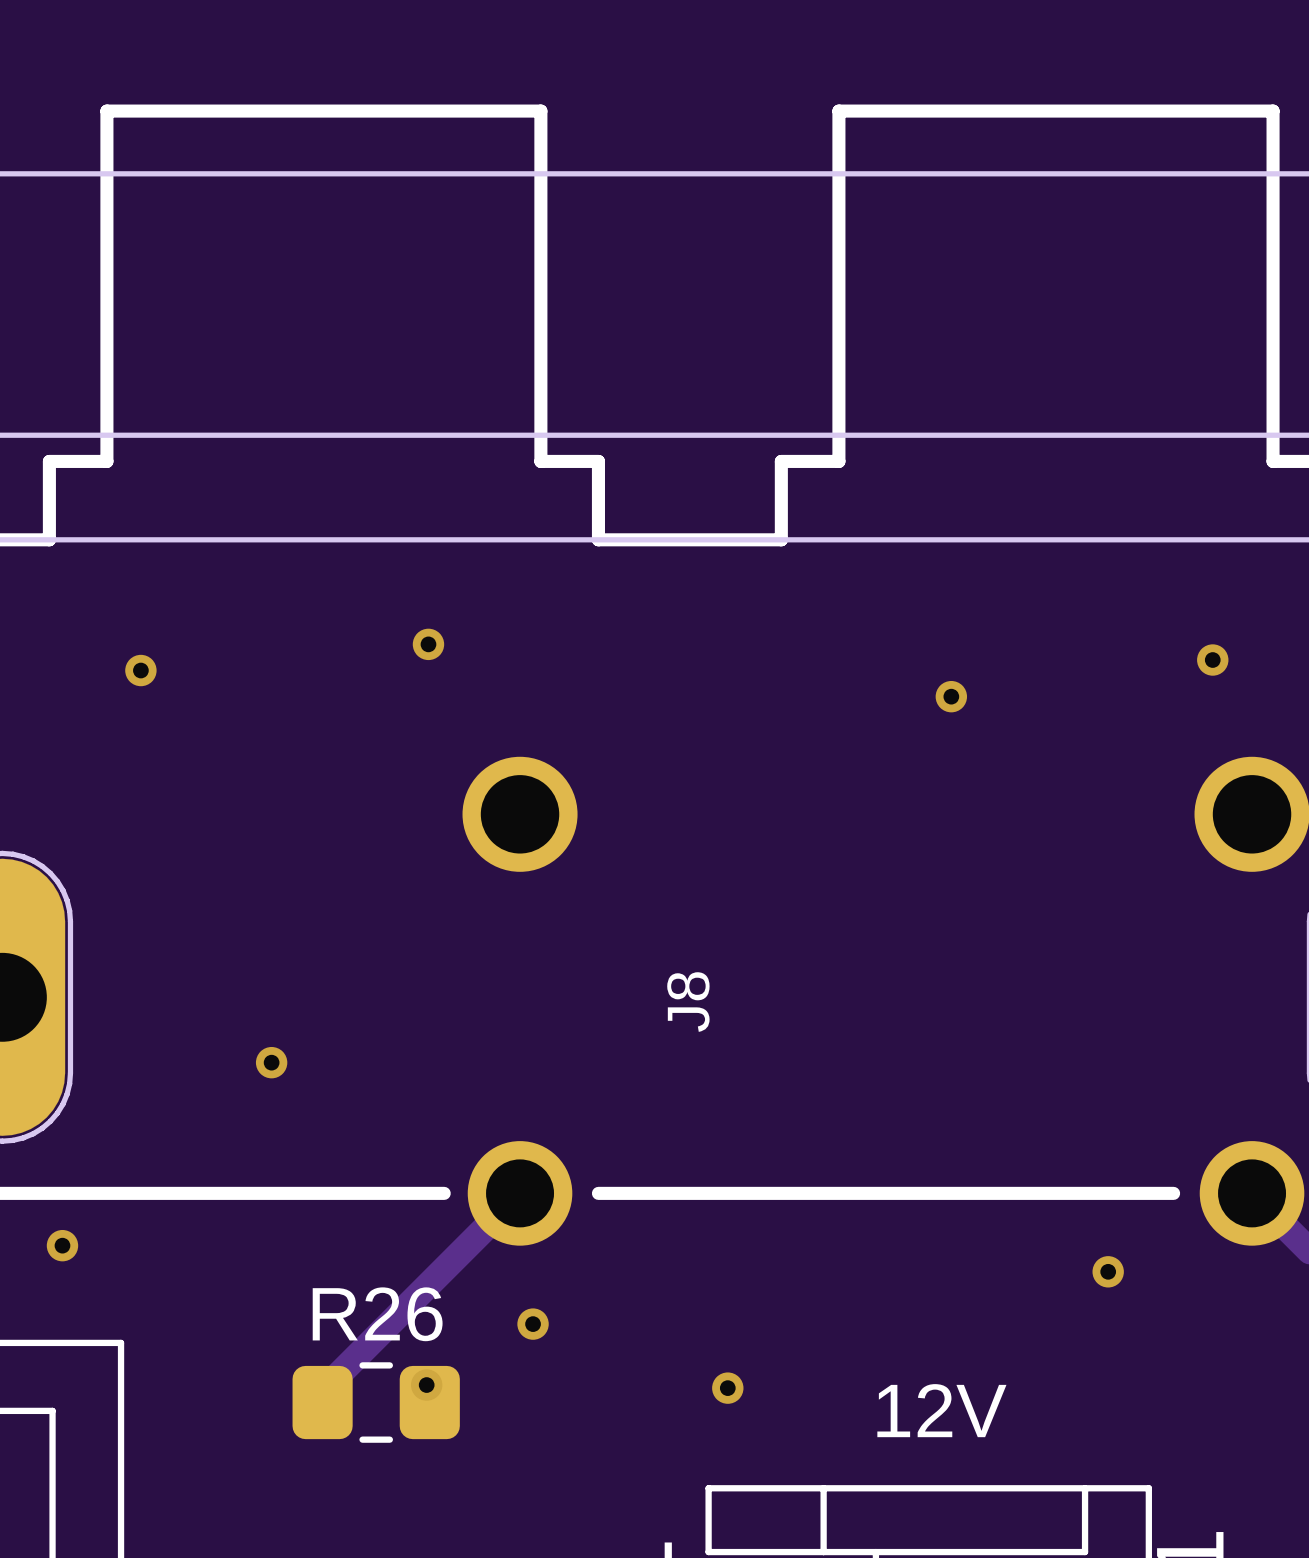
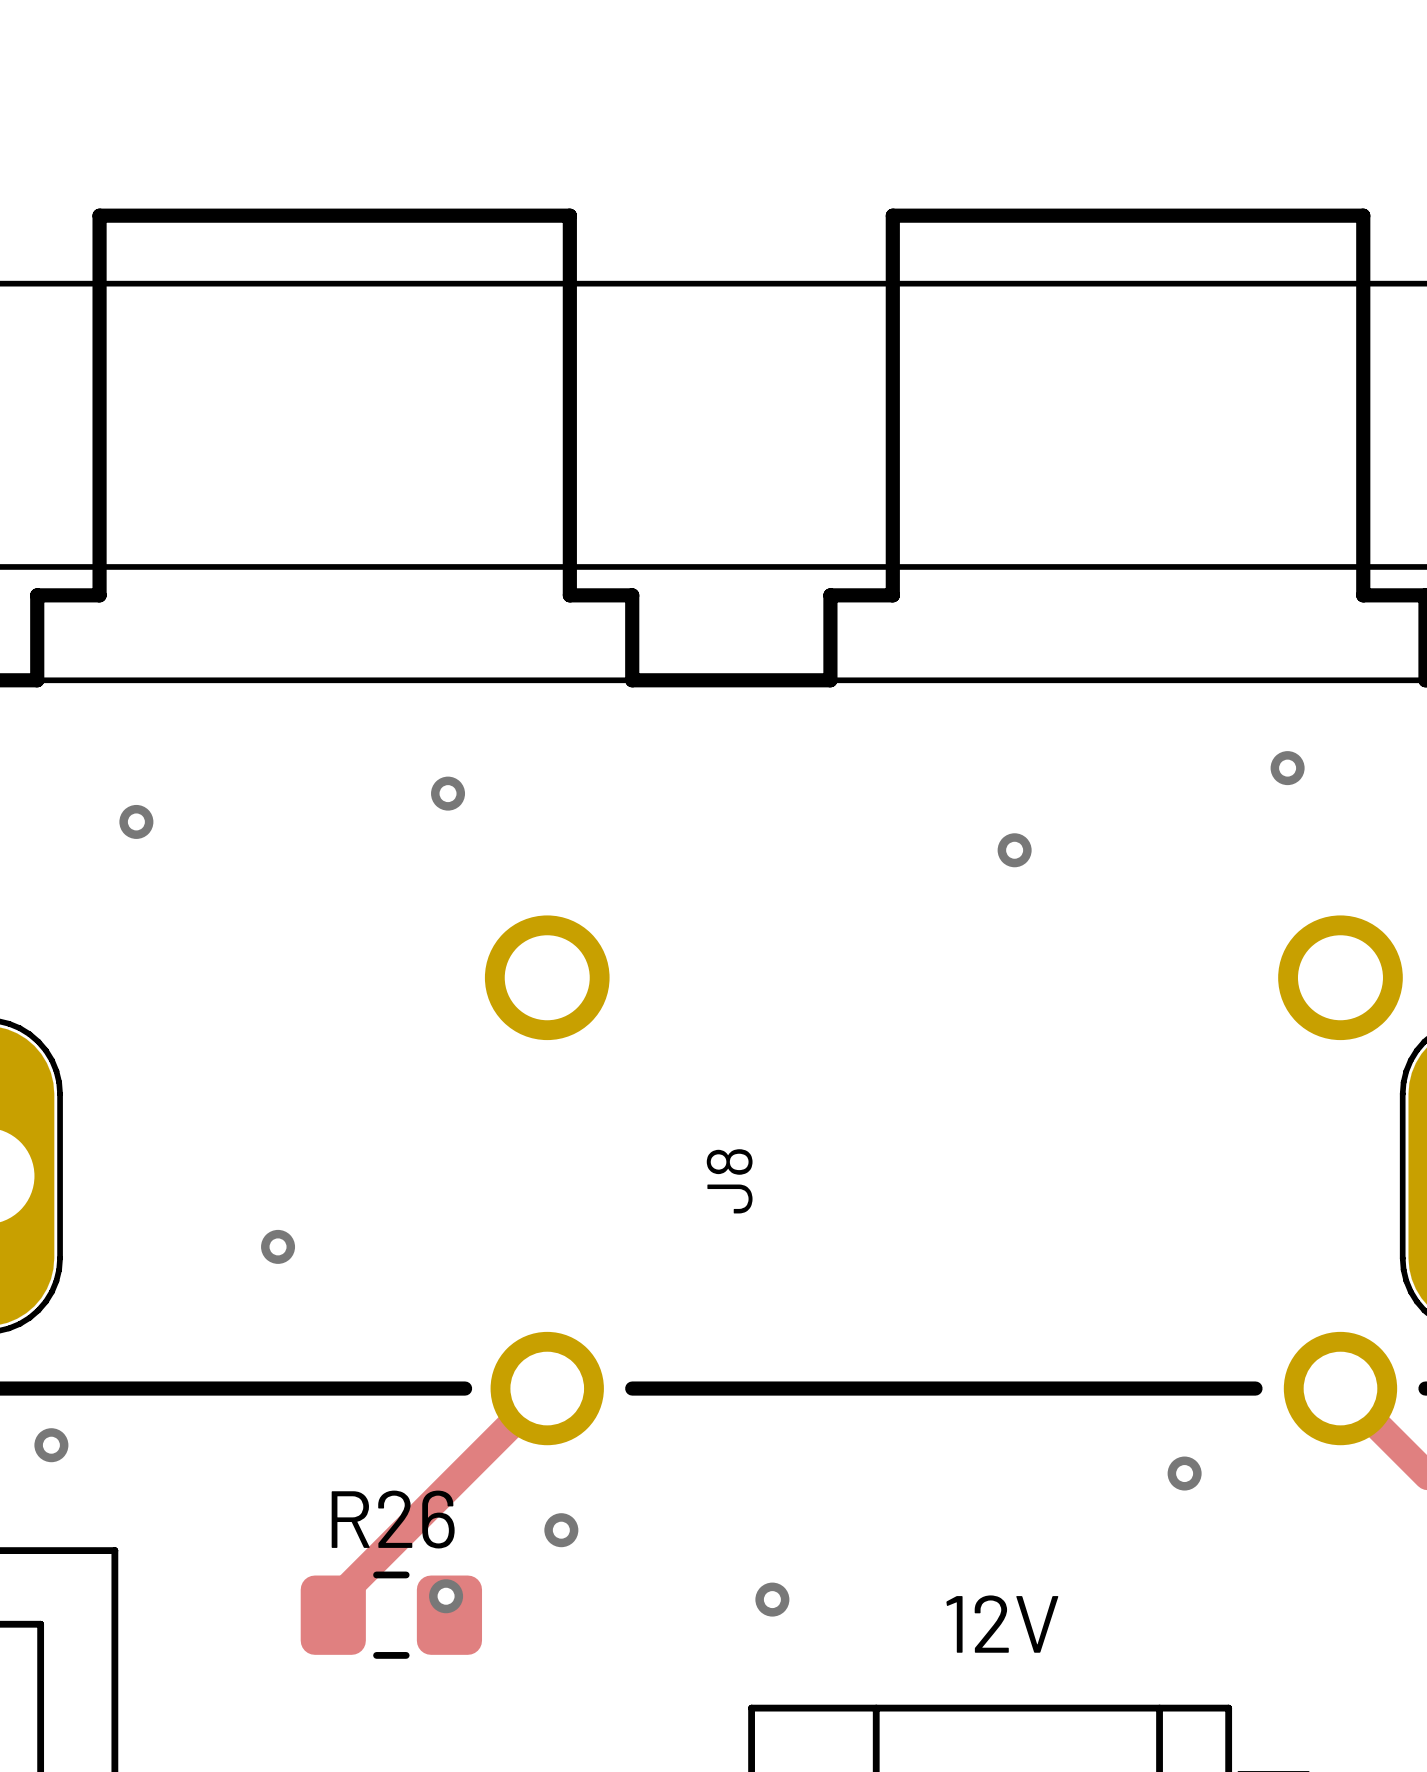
via position: (1212, 660) -> (1287, 768)

